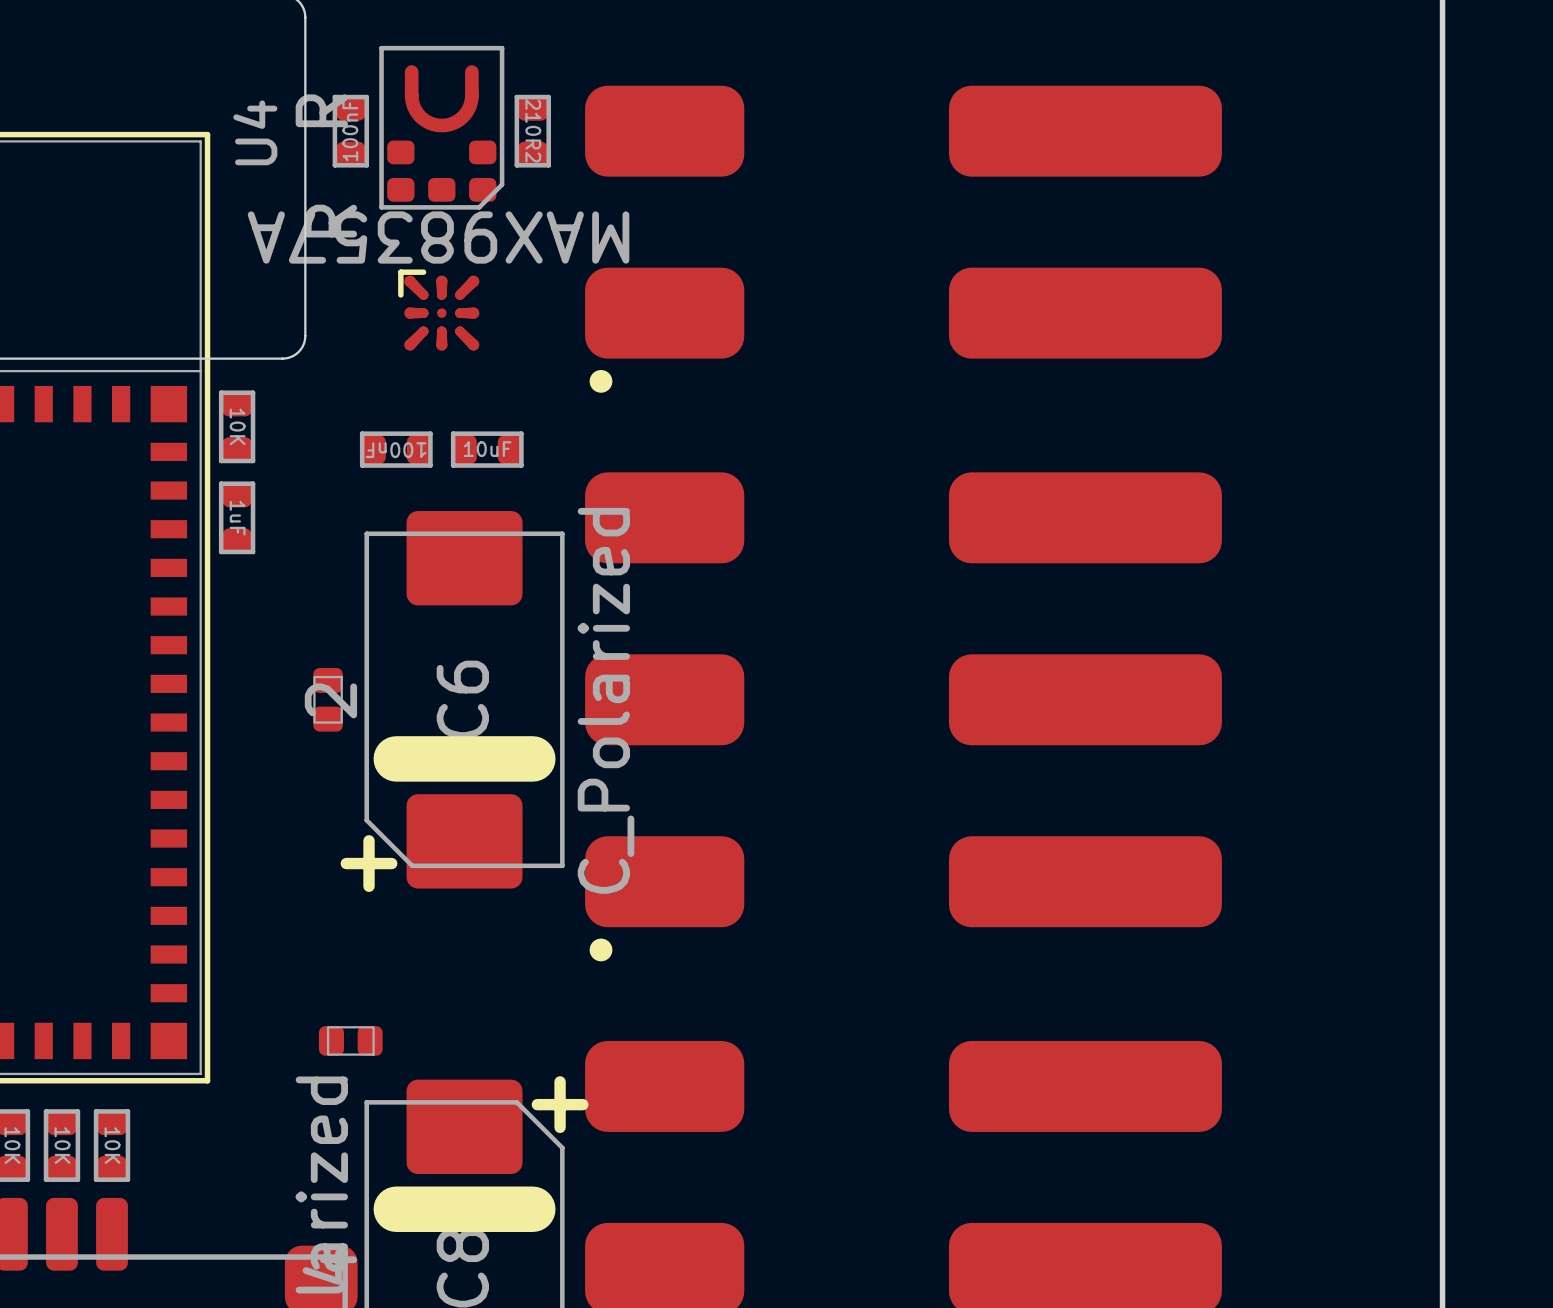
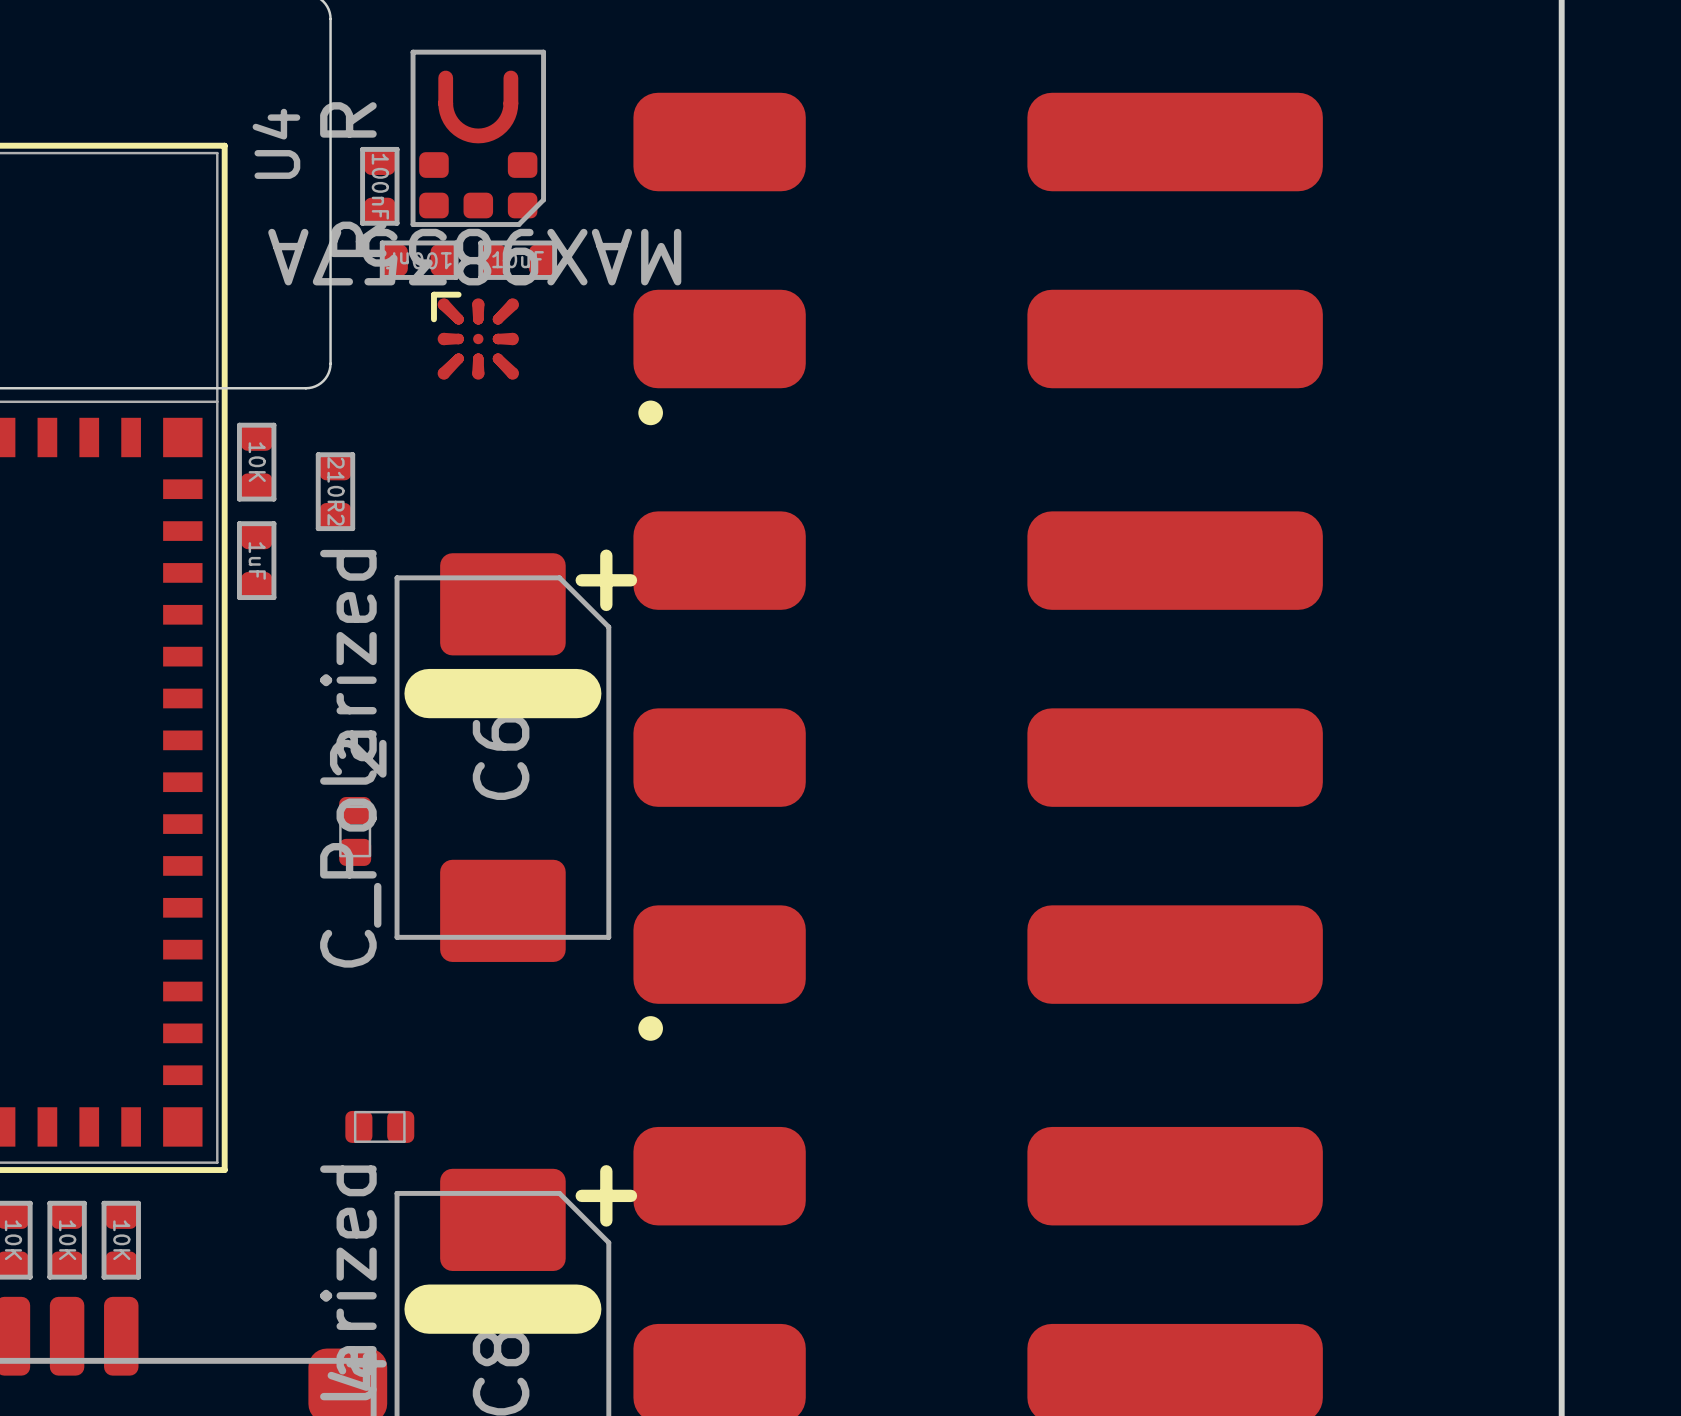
part value rotation: 0° (350, 130) -> 180° (380, 186)
part position: (350, 131) -> (379, 186)
part position: (532, 131) -> (335, 491)
part position: (396, 449) -> (419, 260)
part position: (487, 449) -> (517, 260)
part position: (328, 699) -> (355, 831)
C6 rotation: 0° (452, 701) -> 180° (515, 755)

